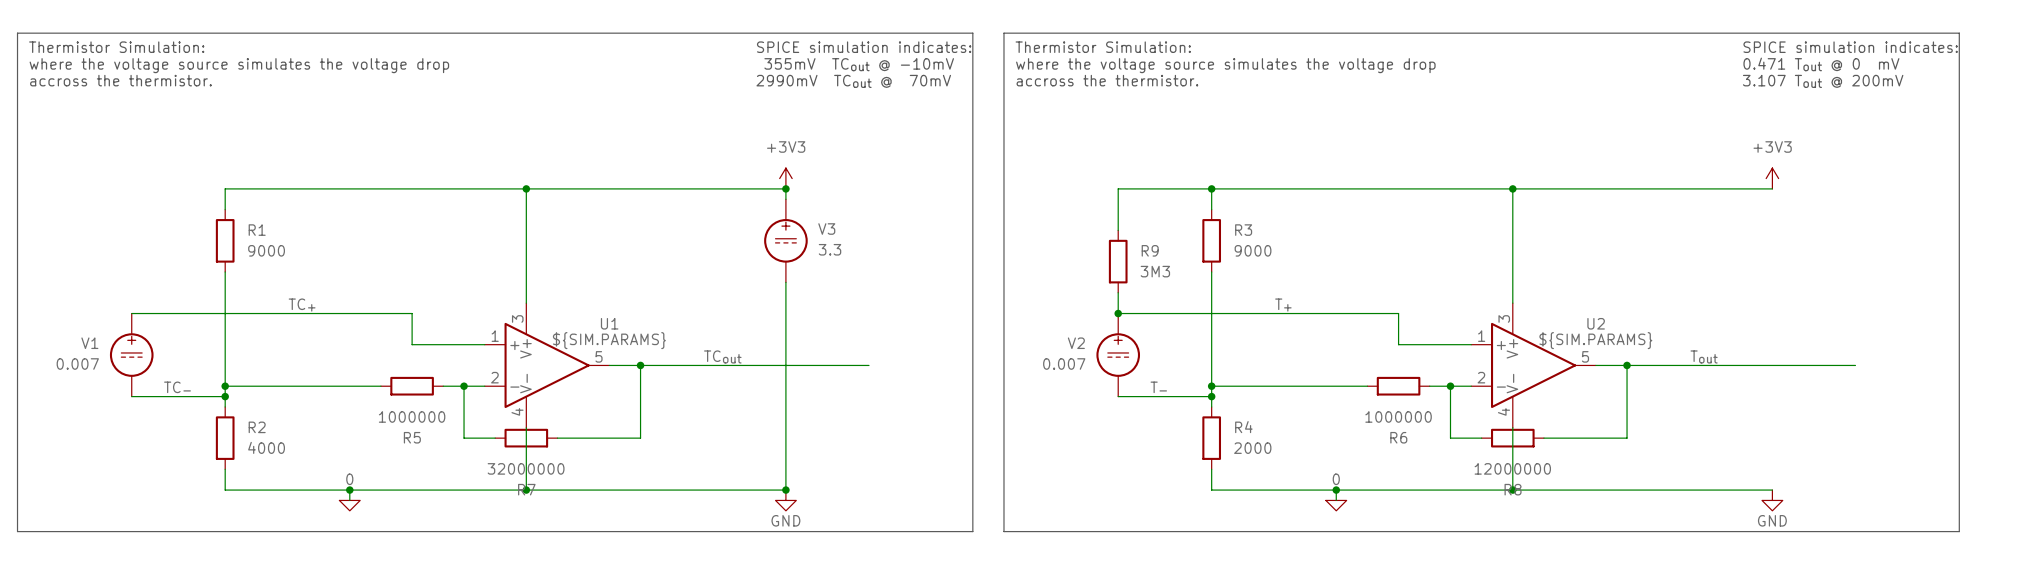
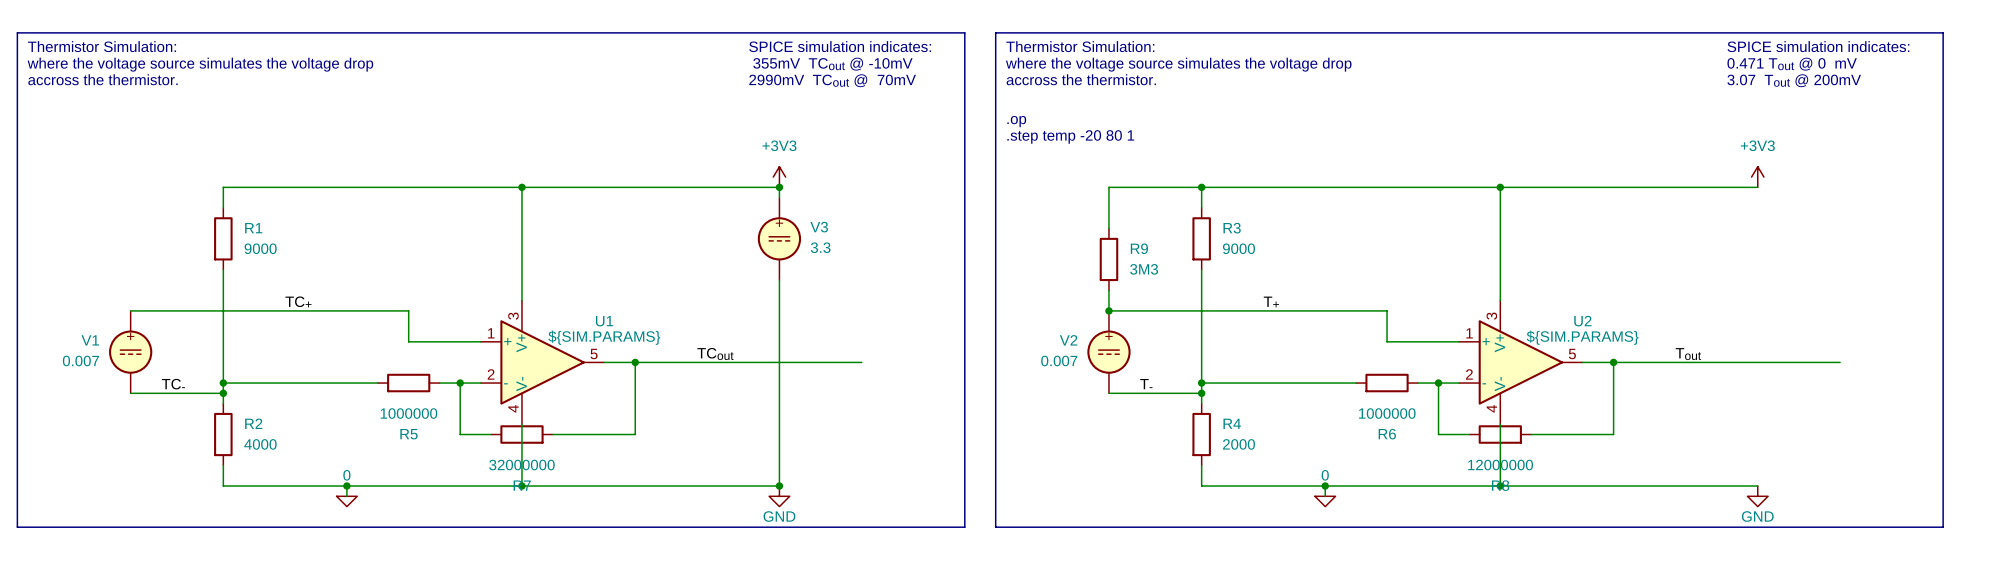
text: 3.107 Tout @ 200mV (1823, 81) -> 3.07 Tout @ 200mV (1794, 80)
text: none -> .op (1016, 121)
text: none -> .step temp -20 80 1 (1070, 136)

